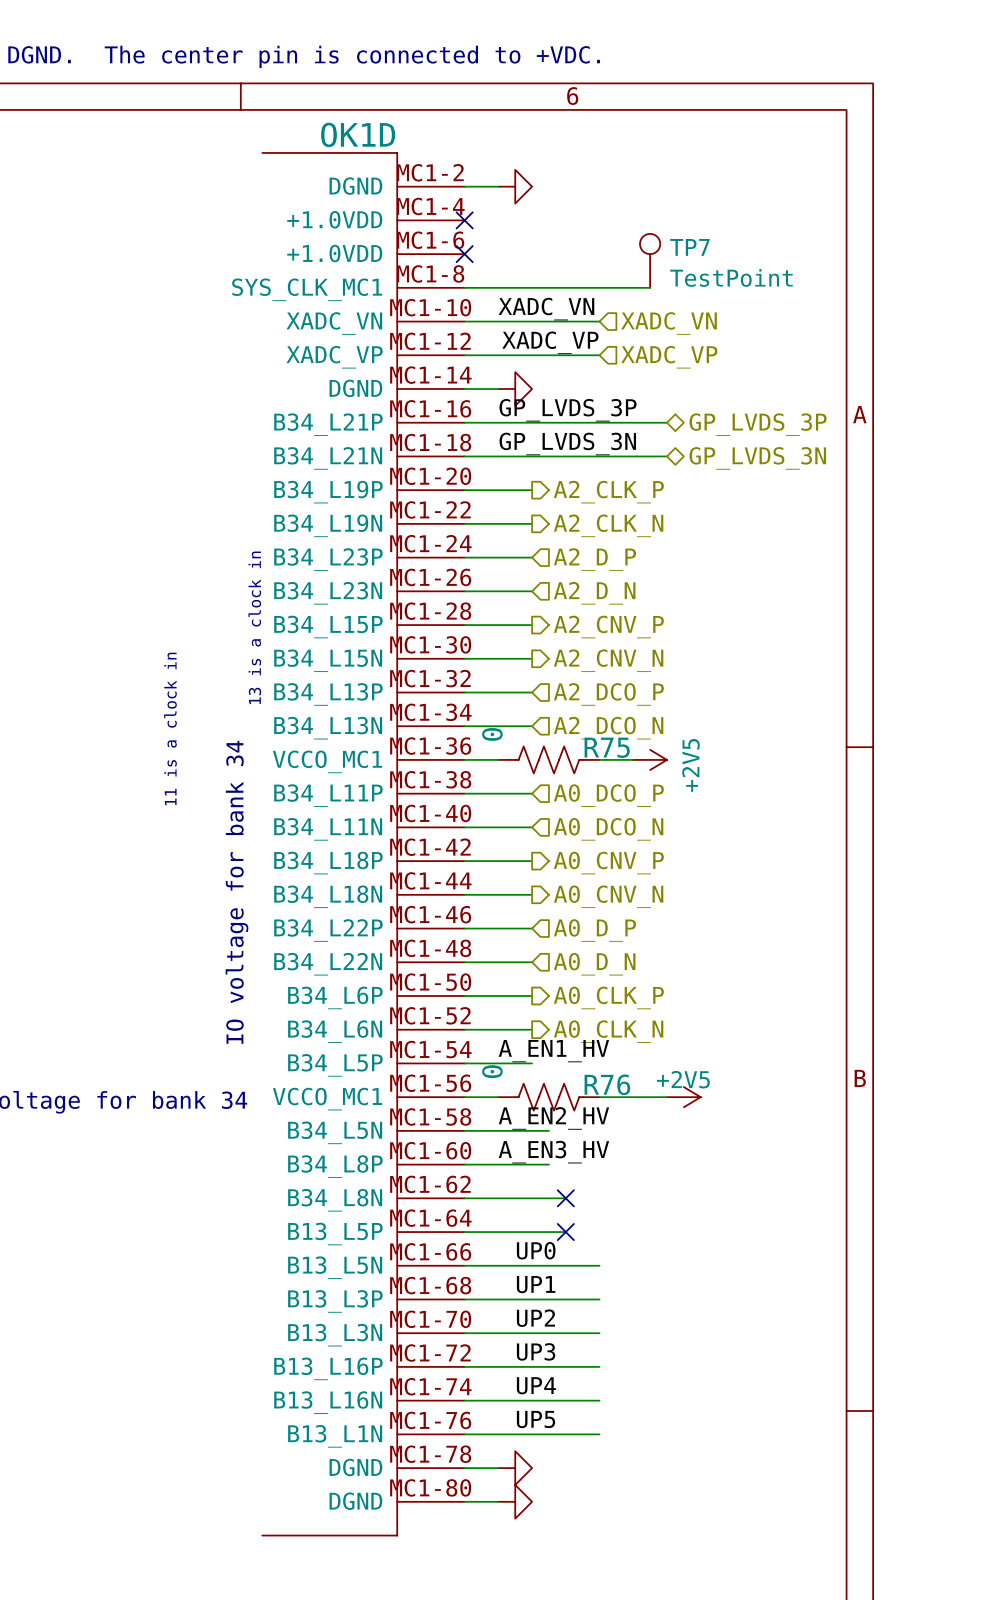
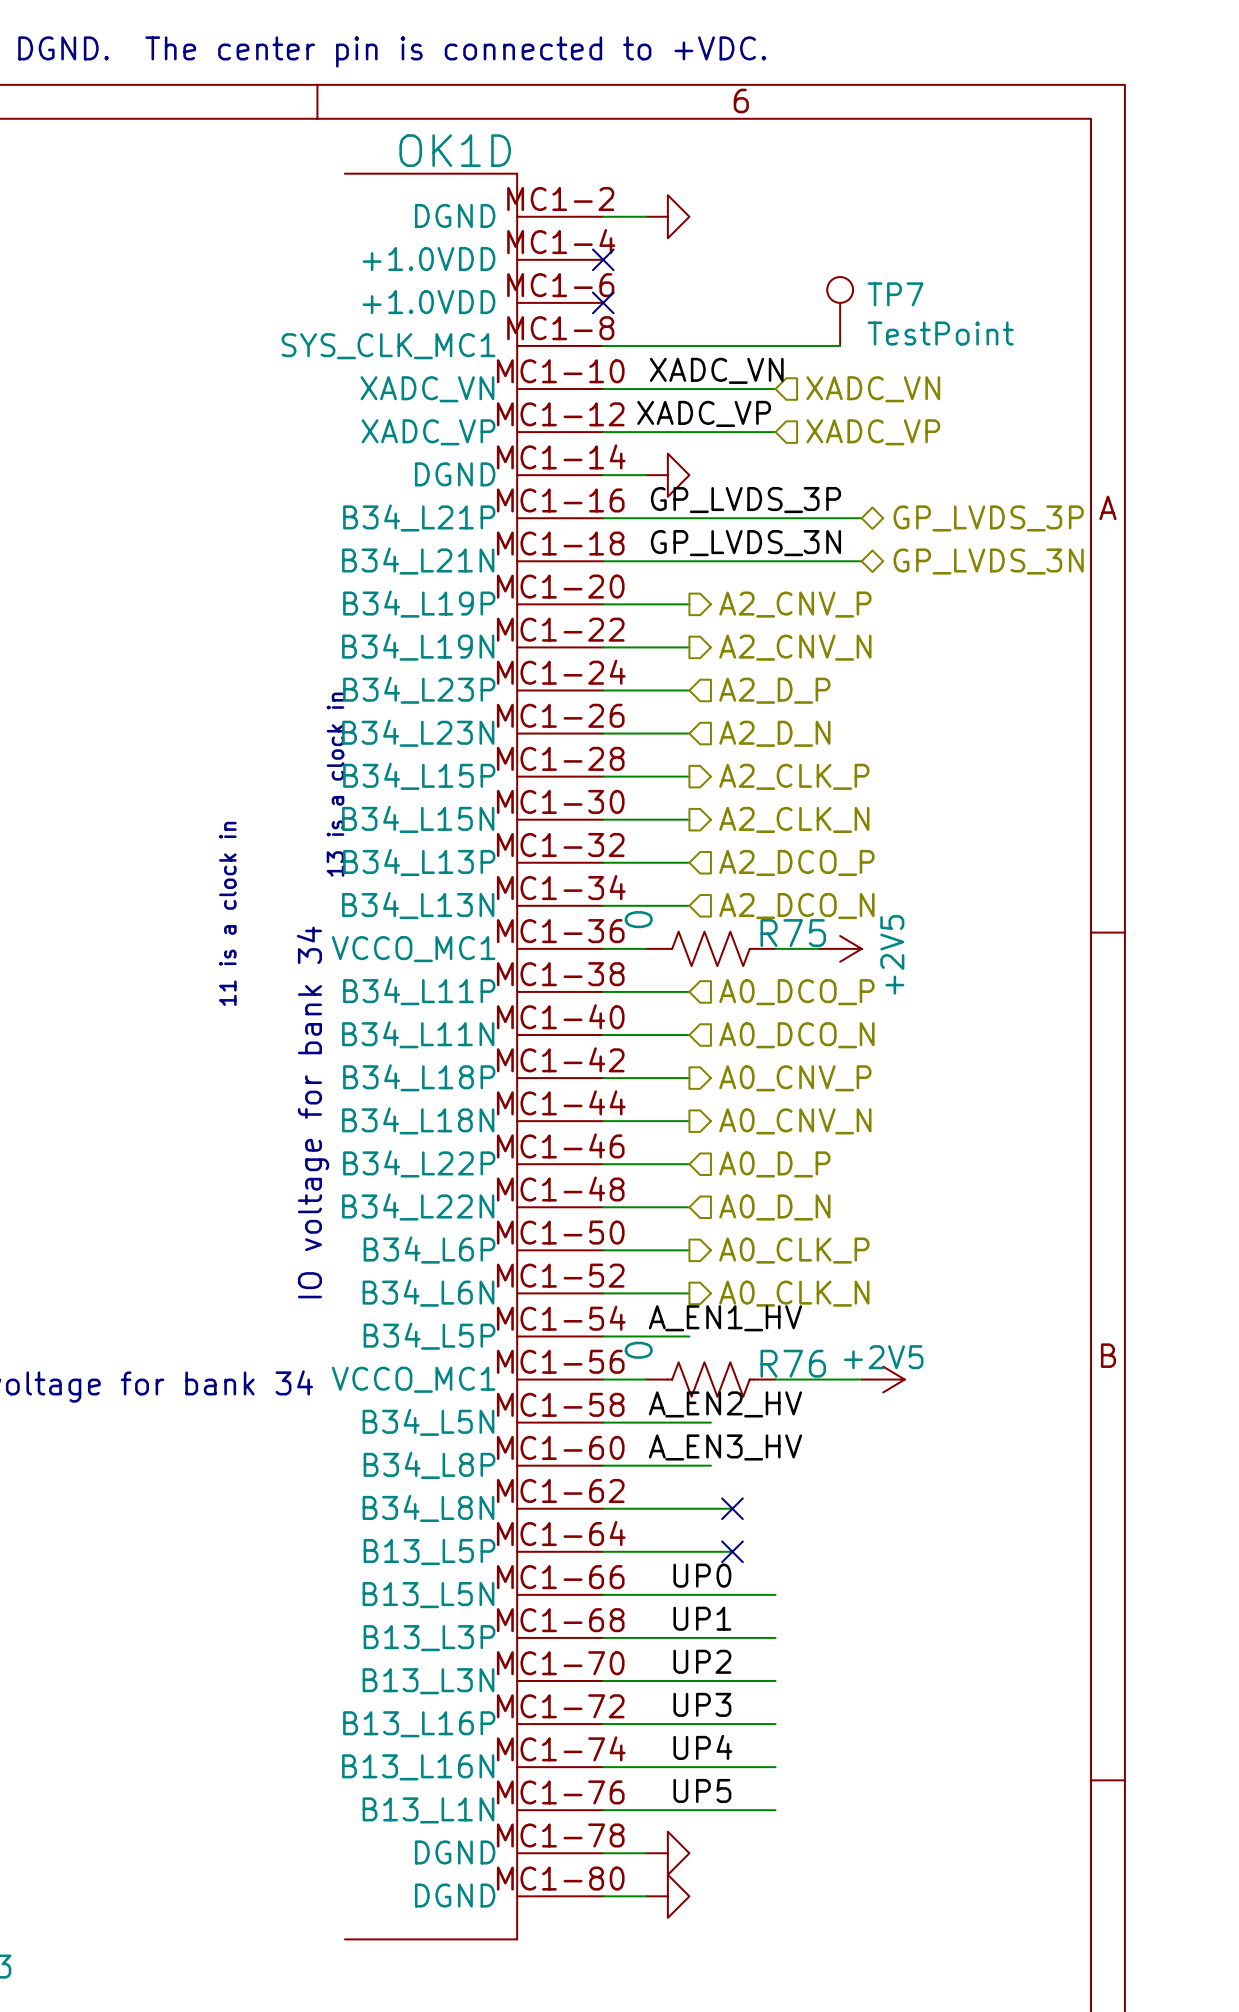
hierarchical label: A2_CLK_P (608, 492) -> A2_CNV_P (795, 604)
hierarchical label: A2_CLK_N (608, 525) -> A2_CNV_N (795, 647)
hierarchical label: A2_CNV_P (608, 627) -> A2_CLK_P (794, 776)
hierarchical label: A2_CNV_N (608, 660) -> A2_CLK_N (794, 819)

